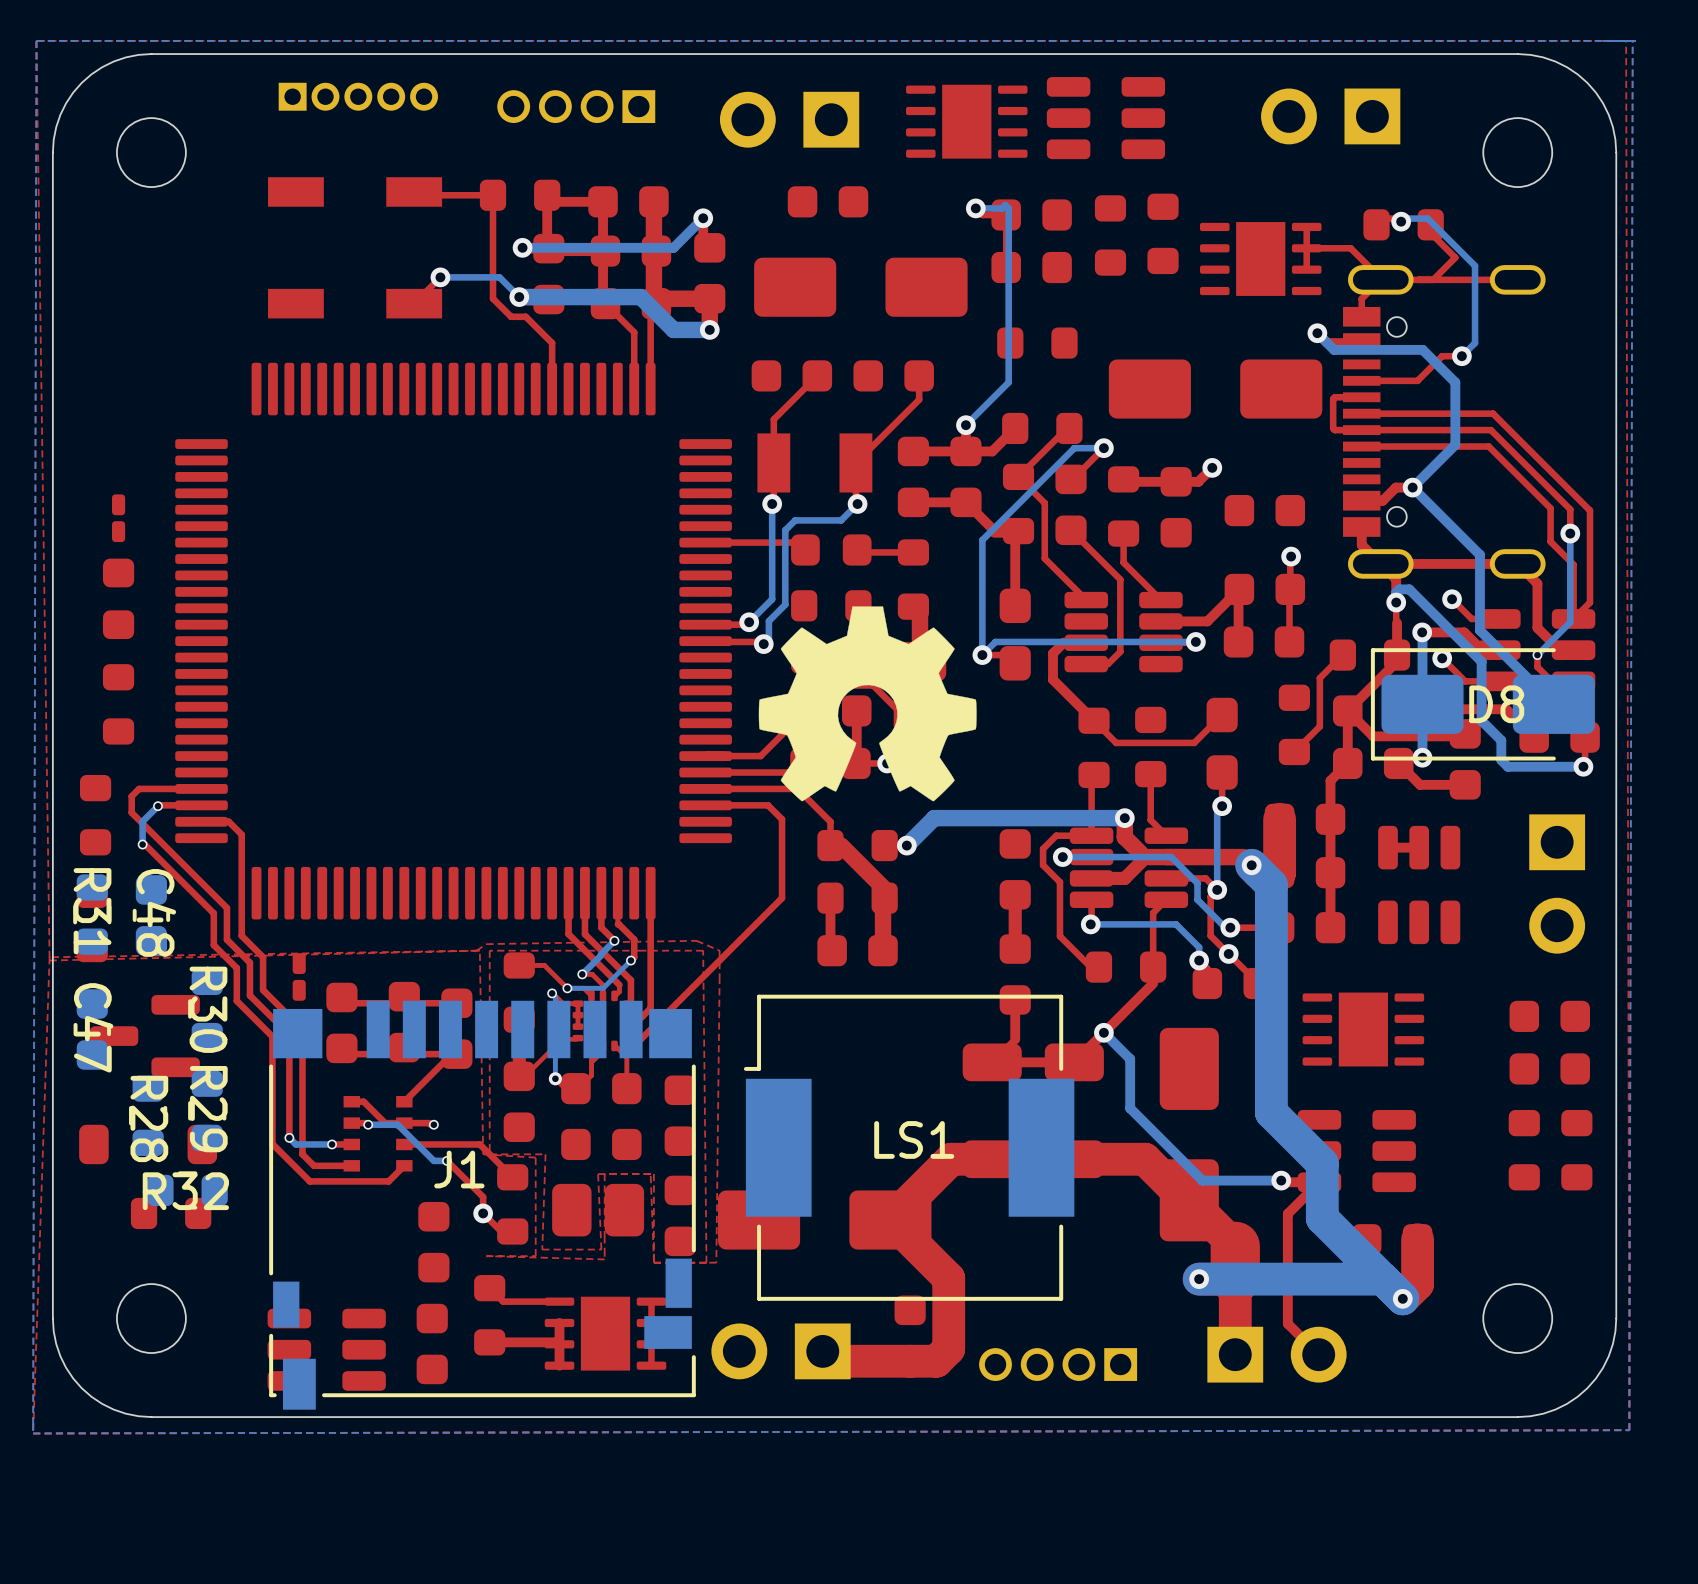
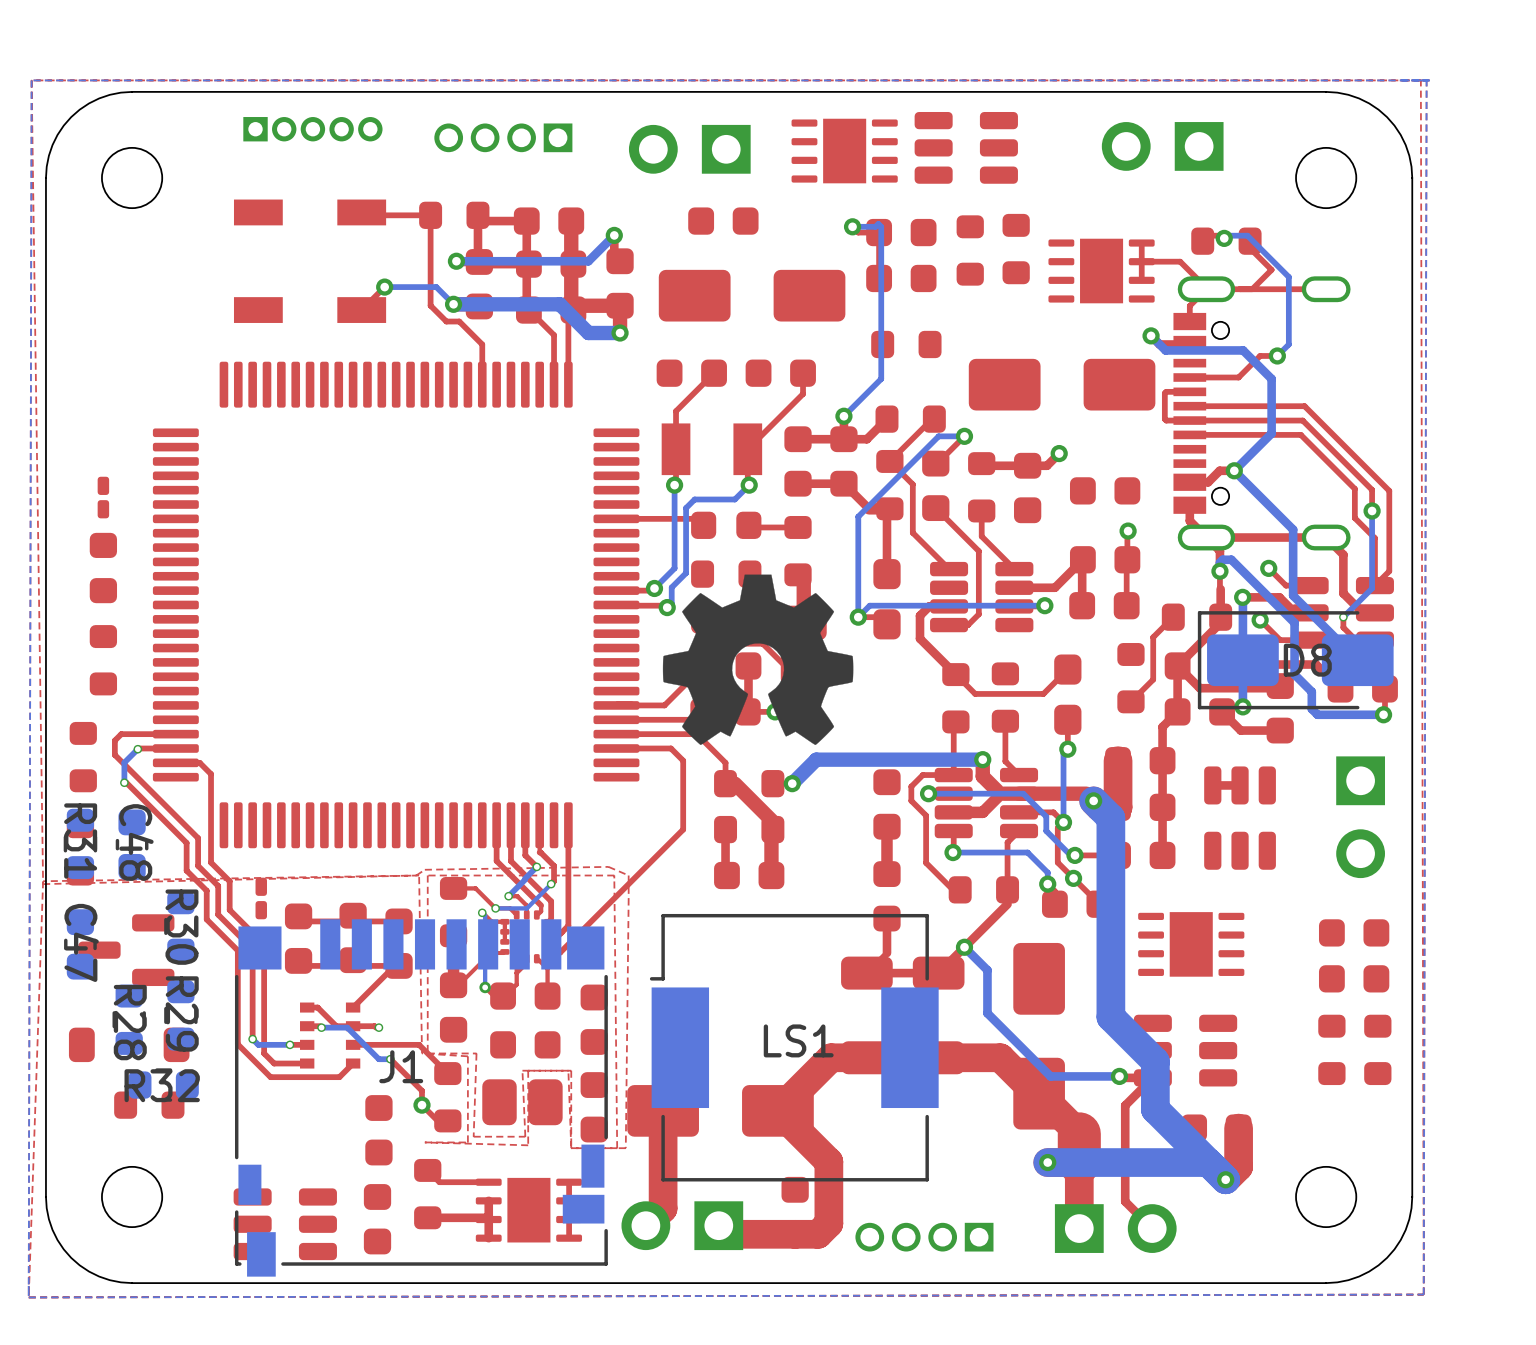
top track: none -> (663, 1110) (663, 1208) (645, 1225)

